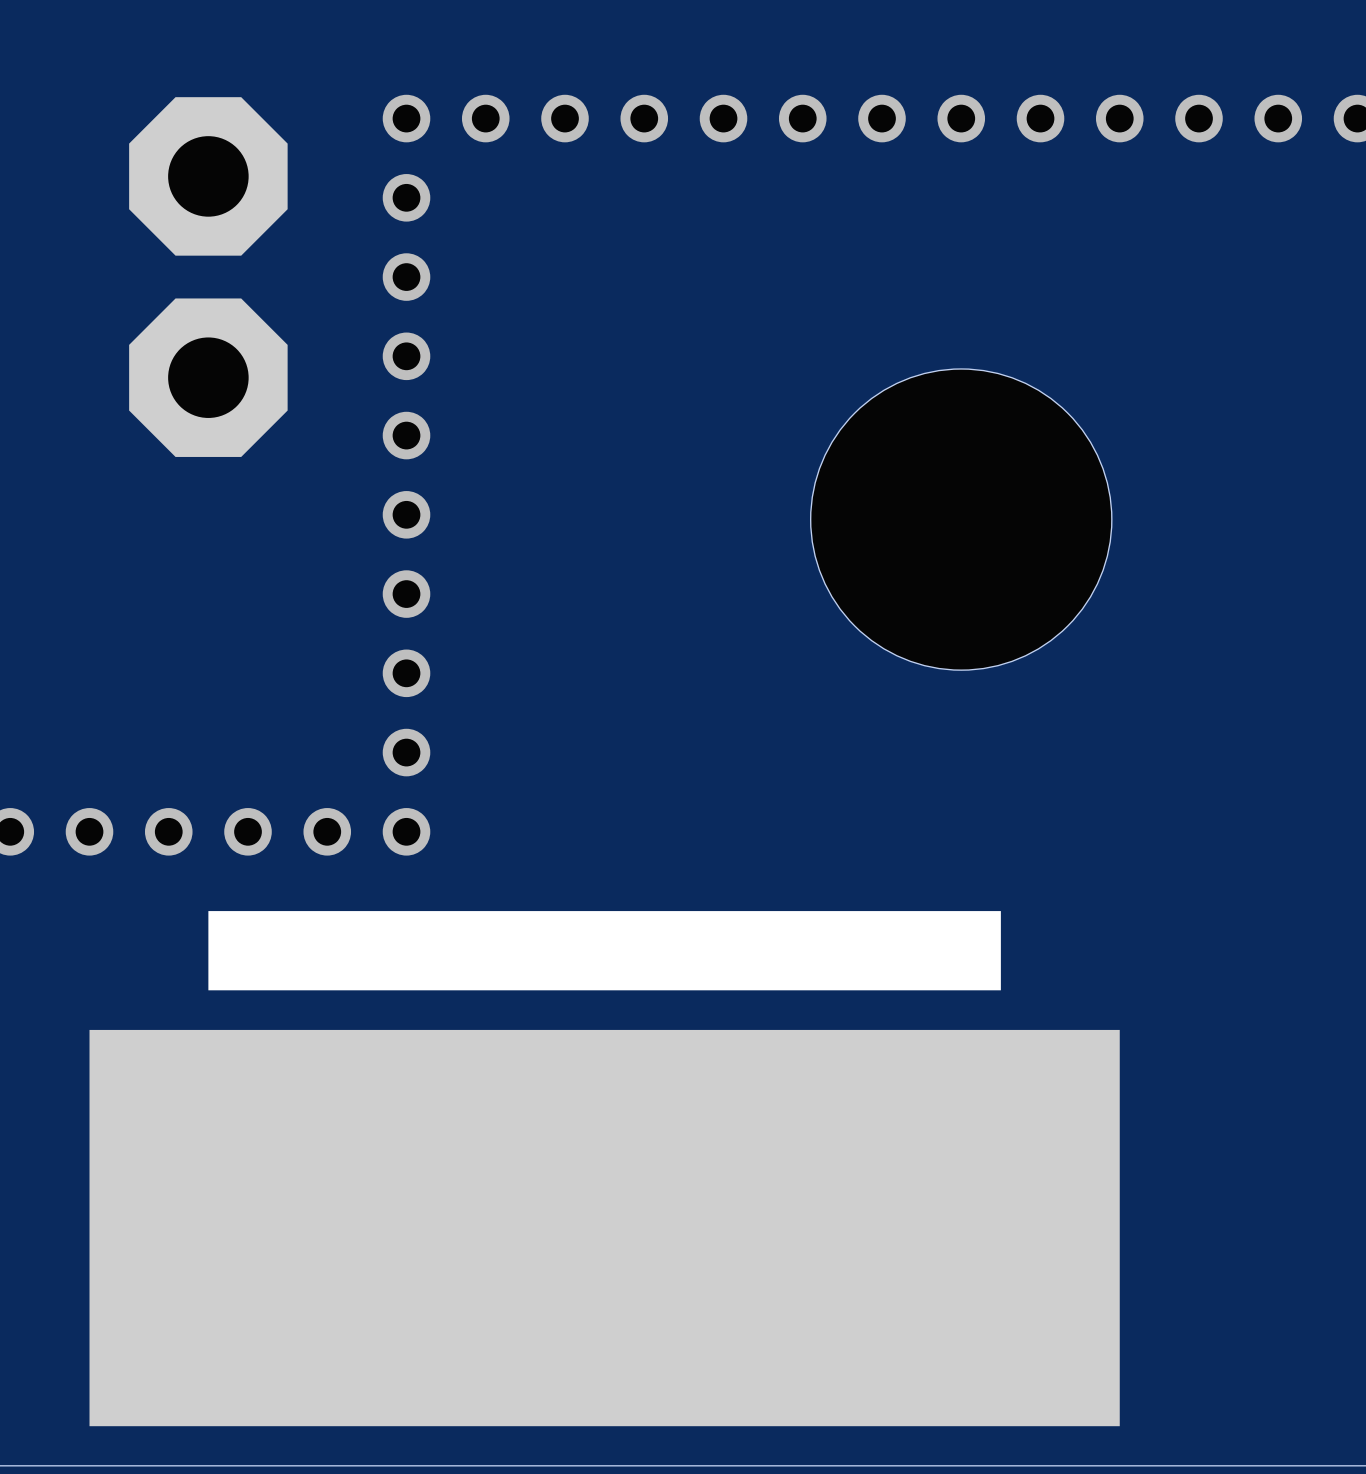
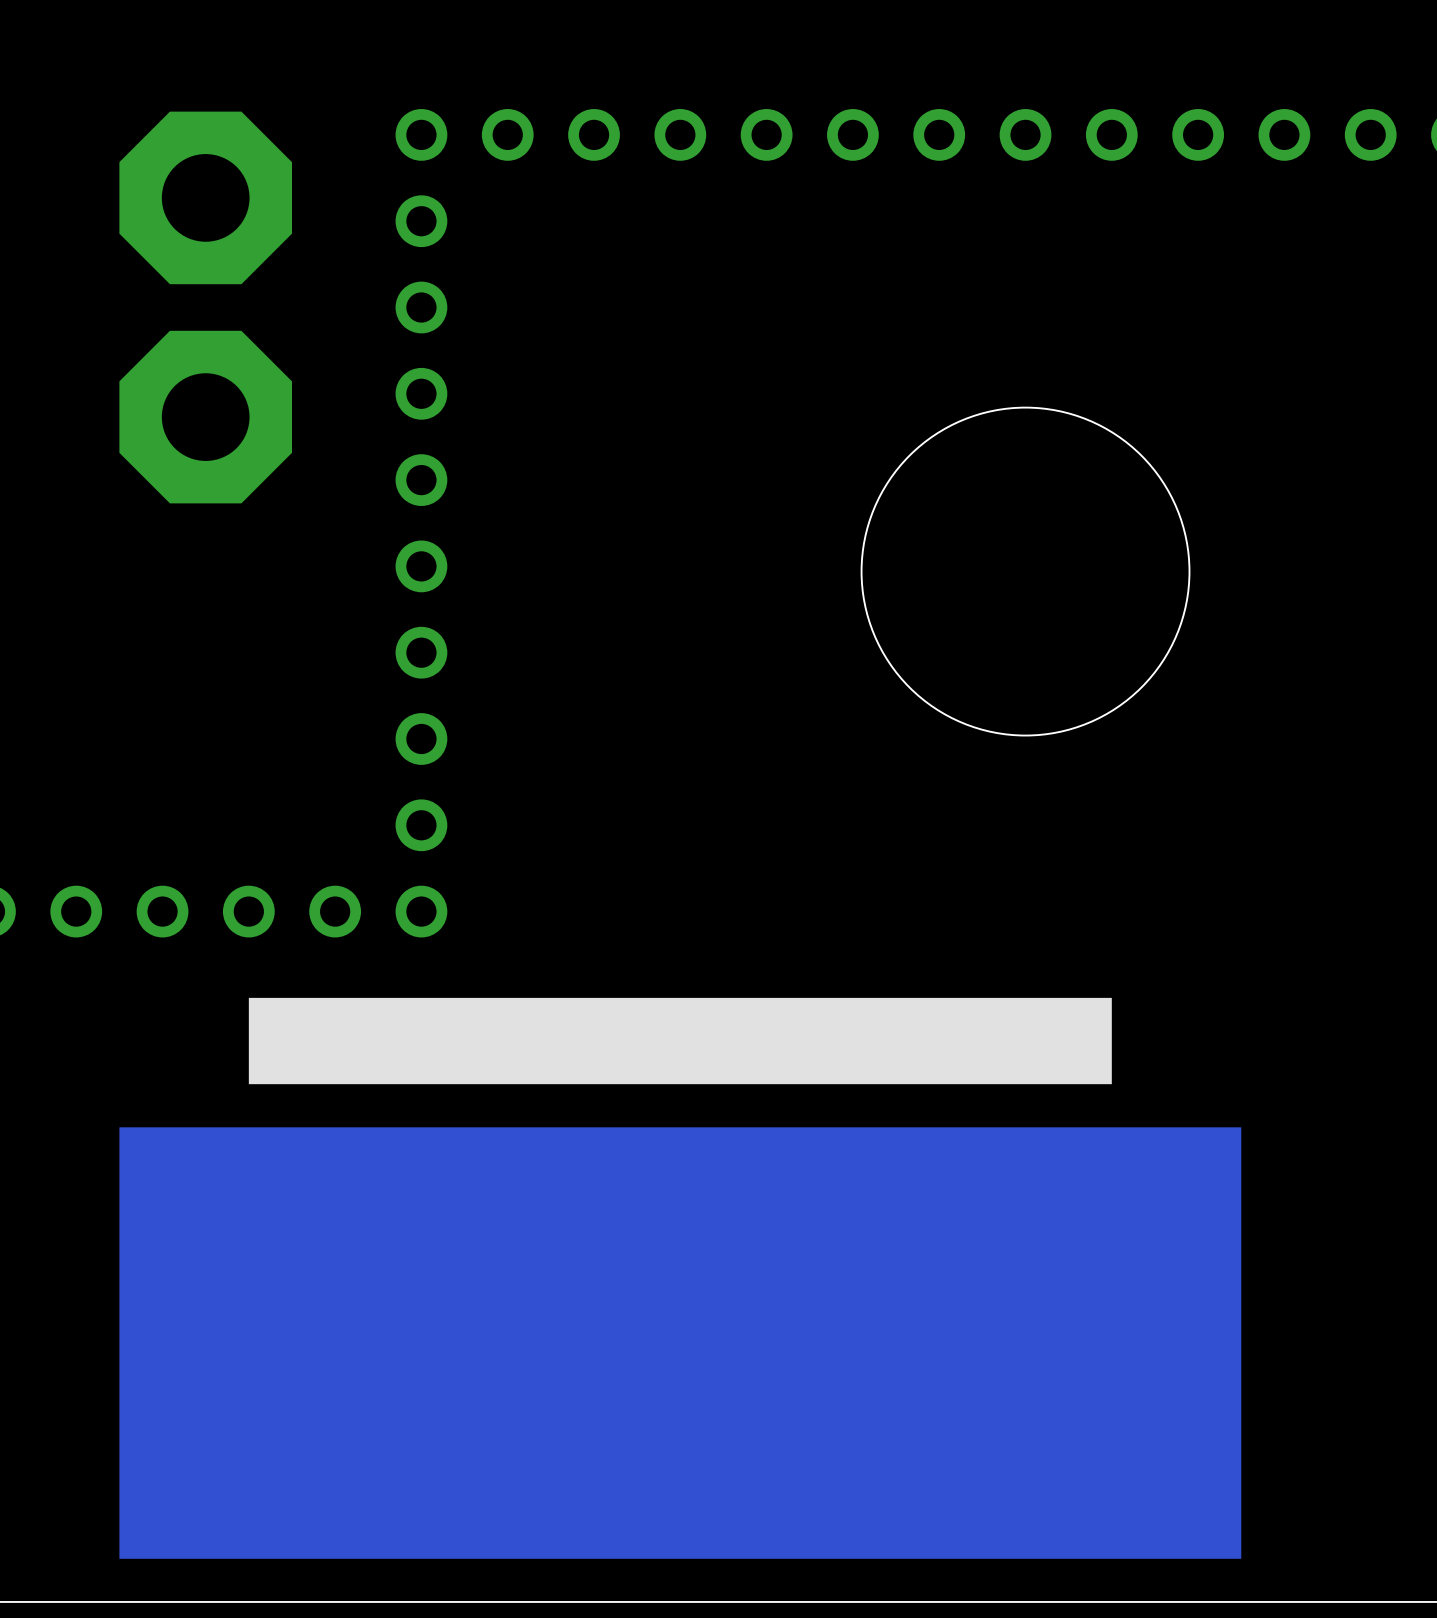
part position: (604, 1168) -> (680, 1278)

